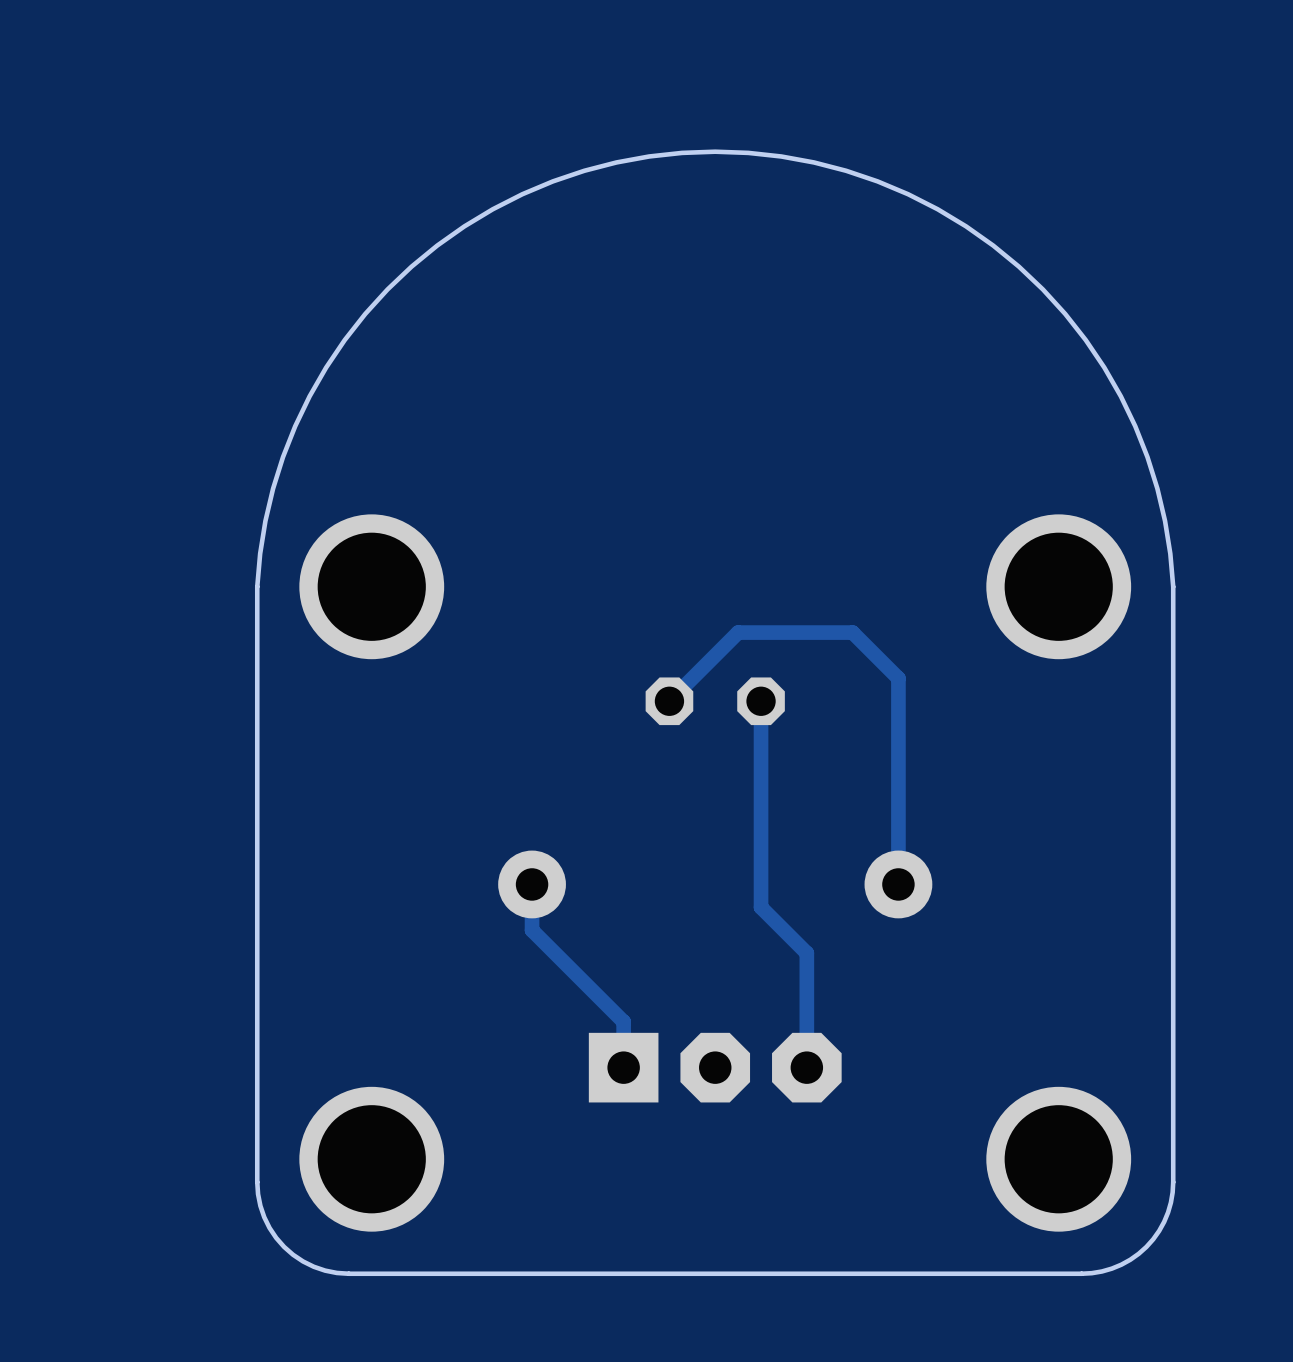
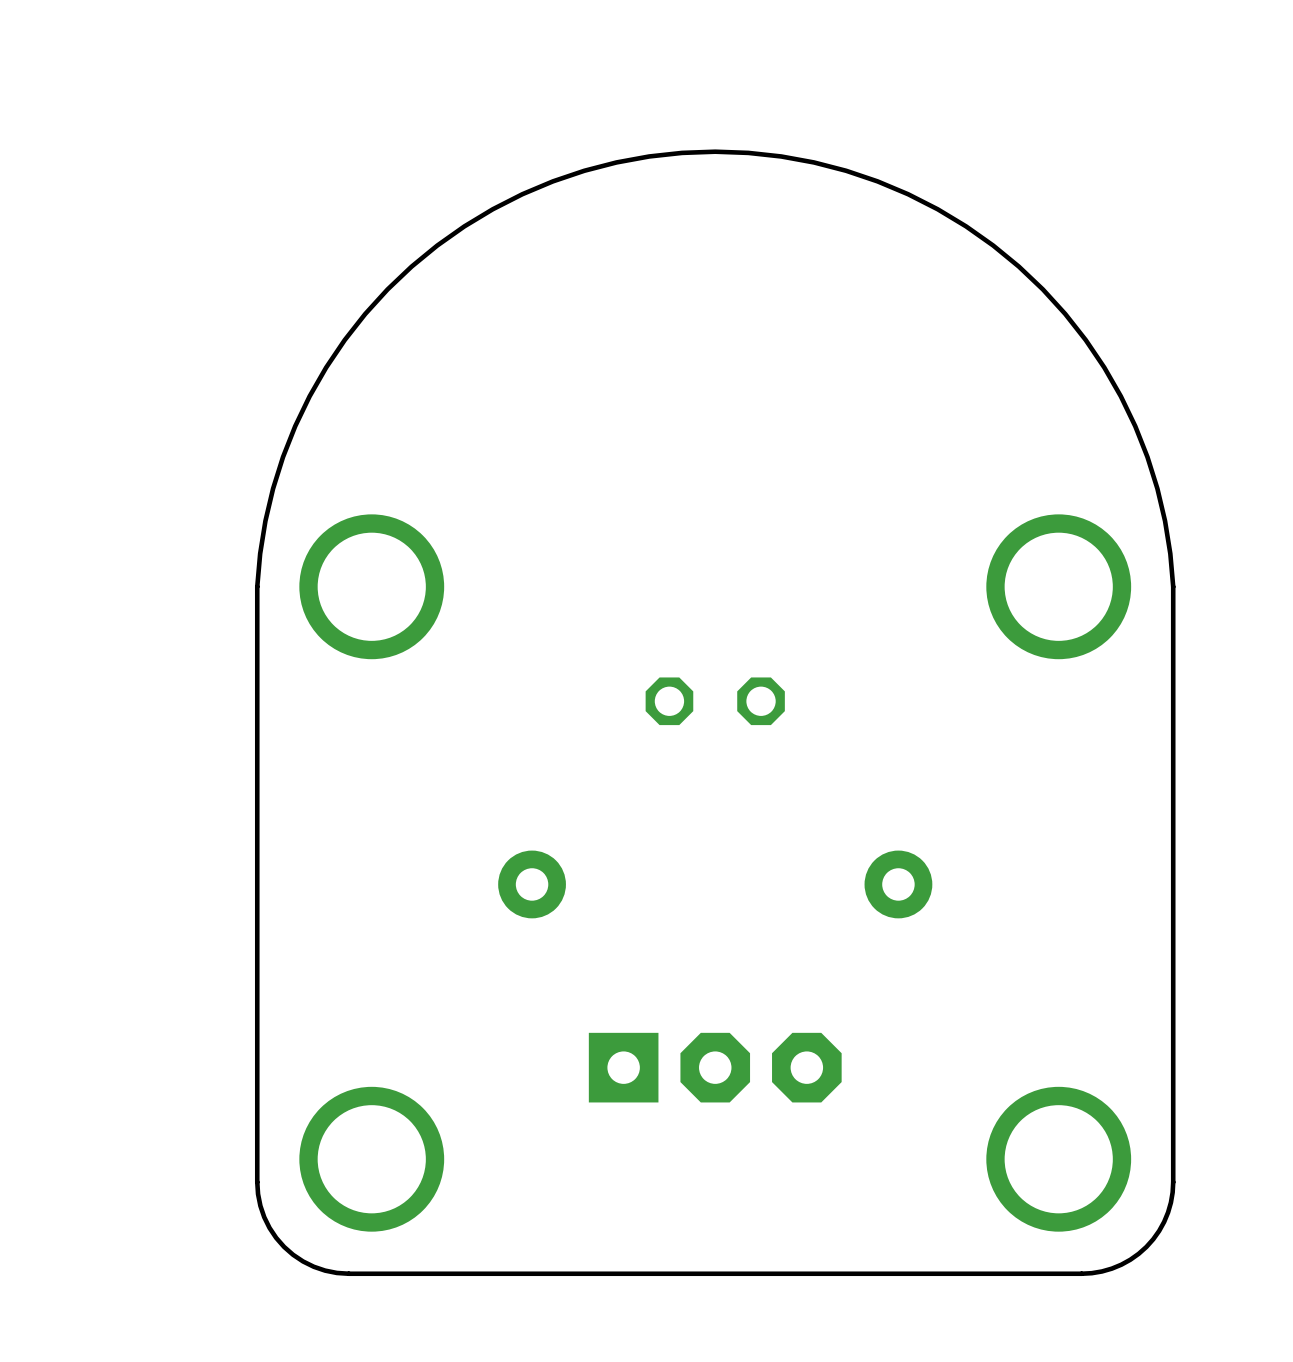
track: (669, 701) (738, 632) (852, 632) (898, 678) (898, 884) -> none
track: (761, 701) (761, 907) (806, 953) (806, 1067) -> none
track: (532, 884) (532, 930) (623, 1021) (623, 1067) -> none

